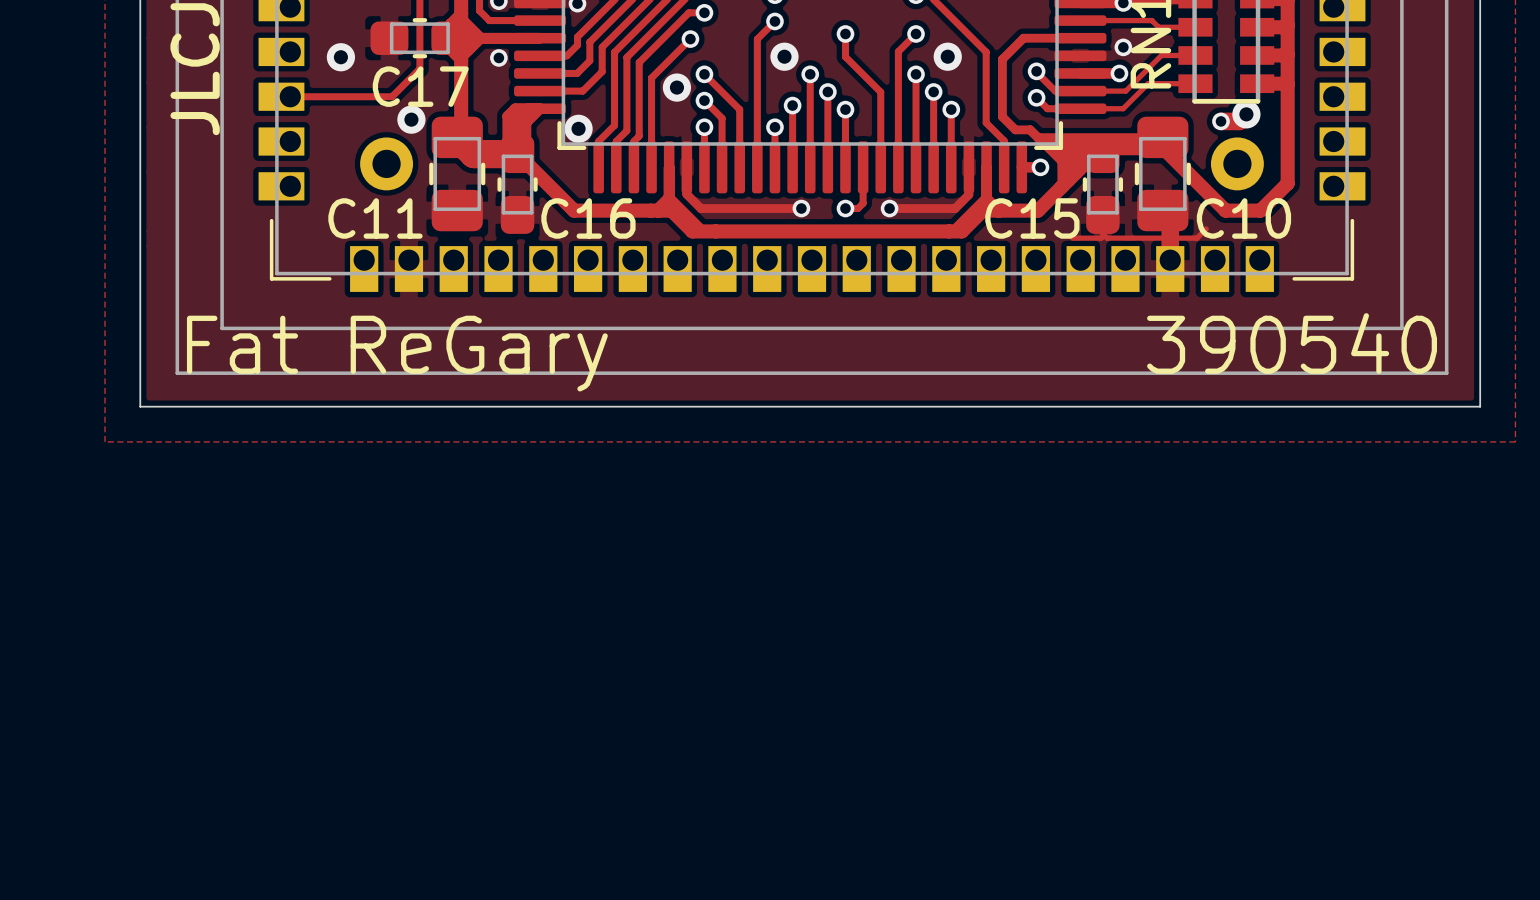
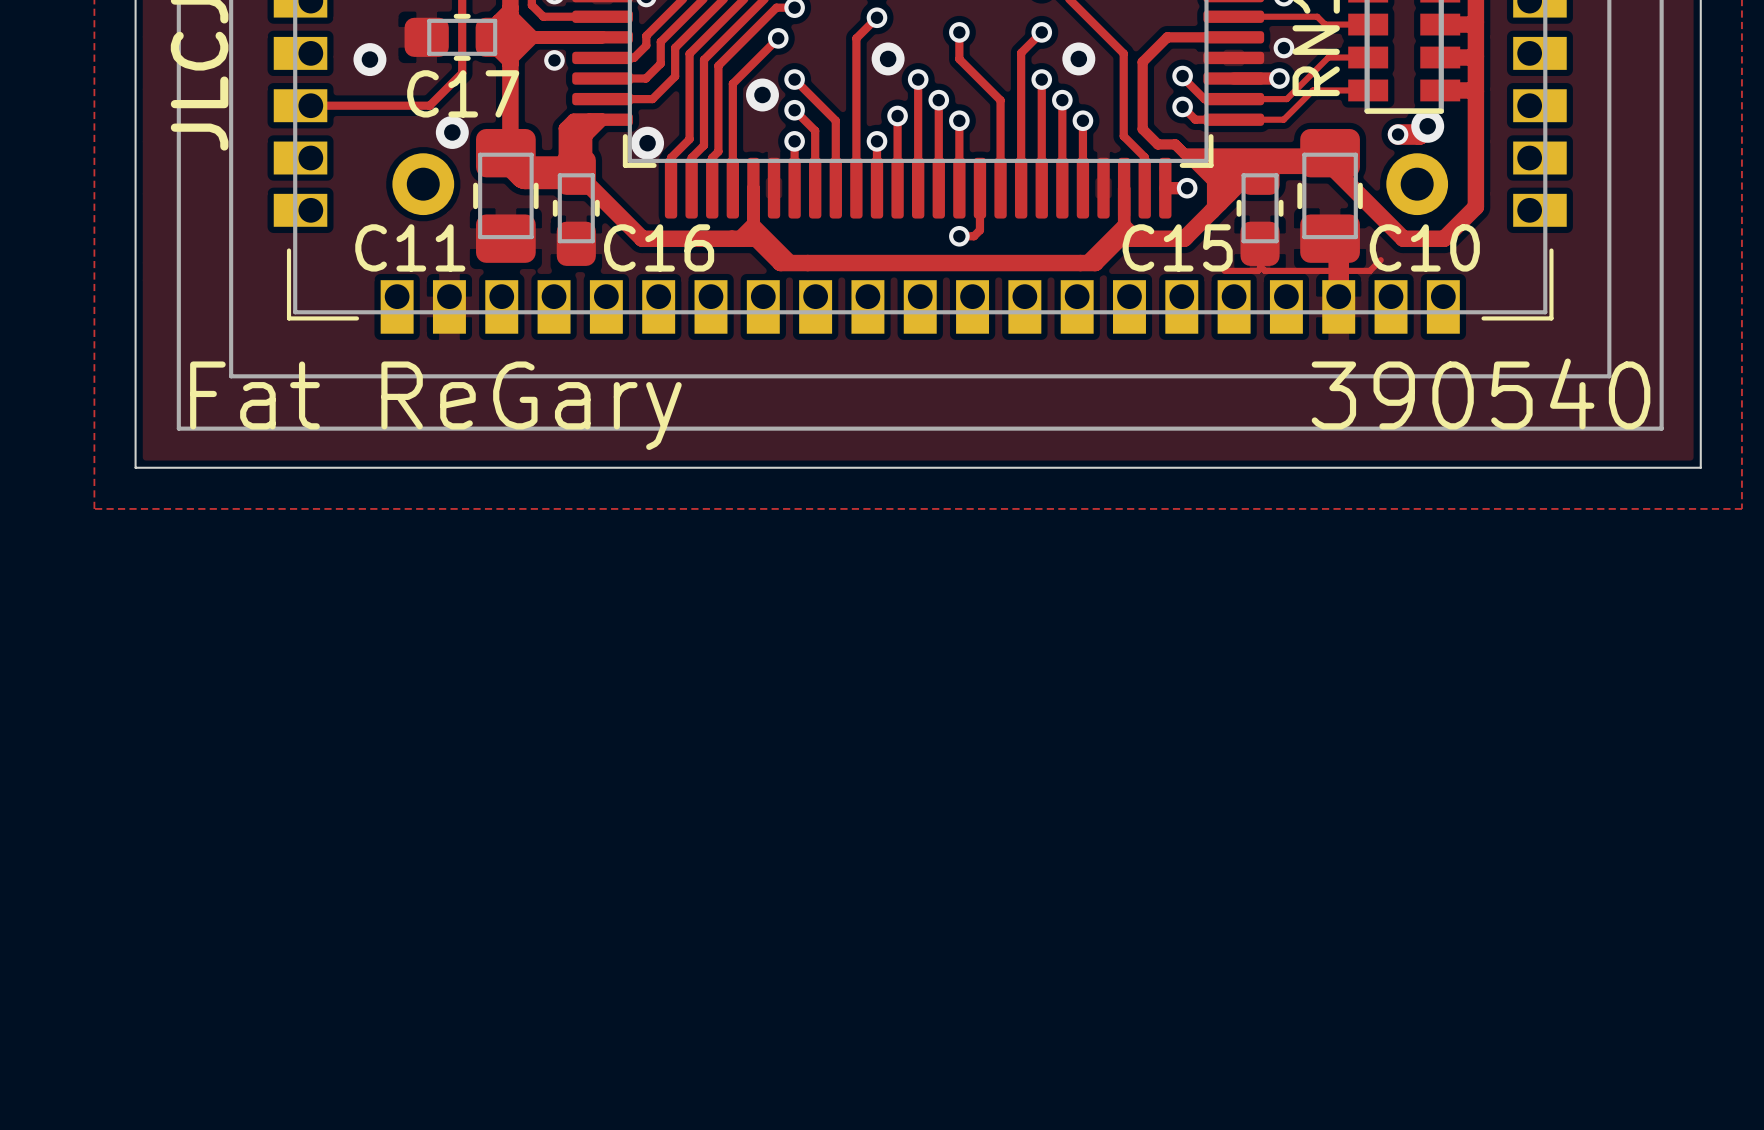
track: (968, 167) (968, 194) (955, 208) (889, 208) -> none
track: (686, 190) (686, 167) (686, 194) (700, 208) (801, 208) -> none
via: (801, 208) -> none
via: (889, 208) -> none

